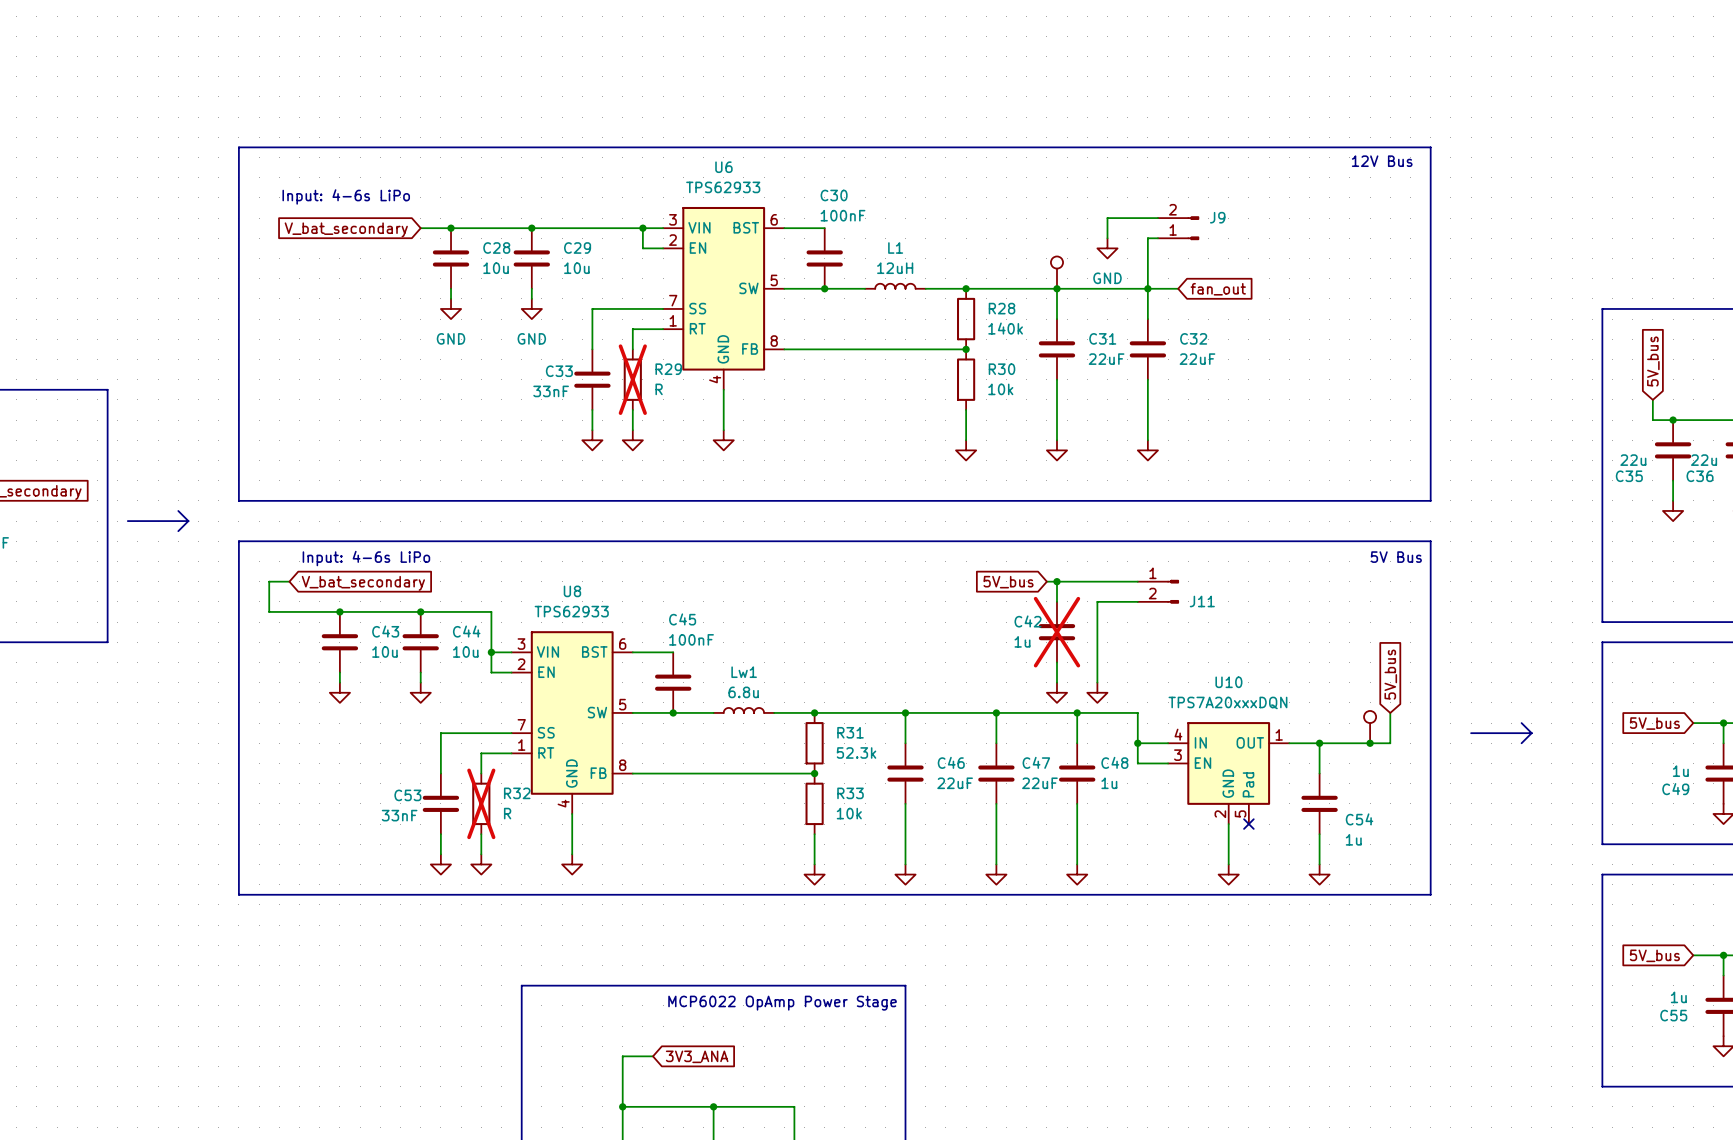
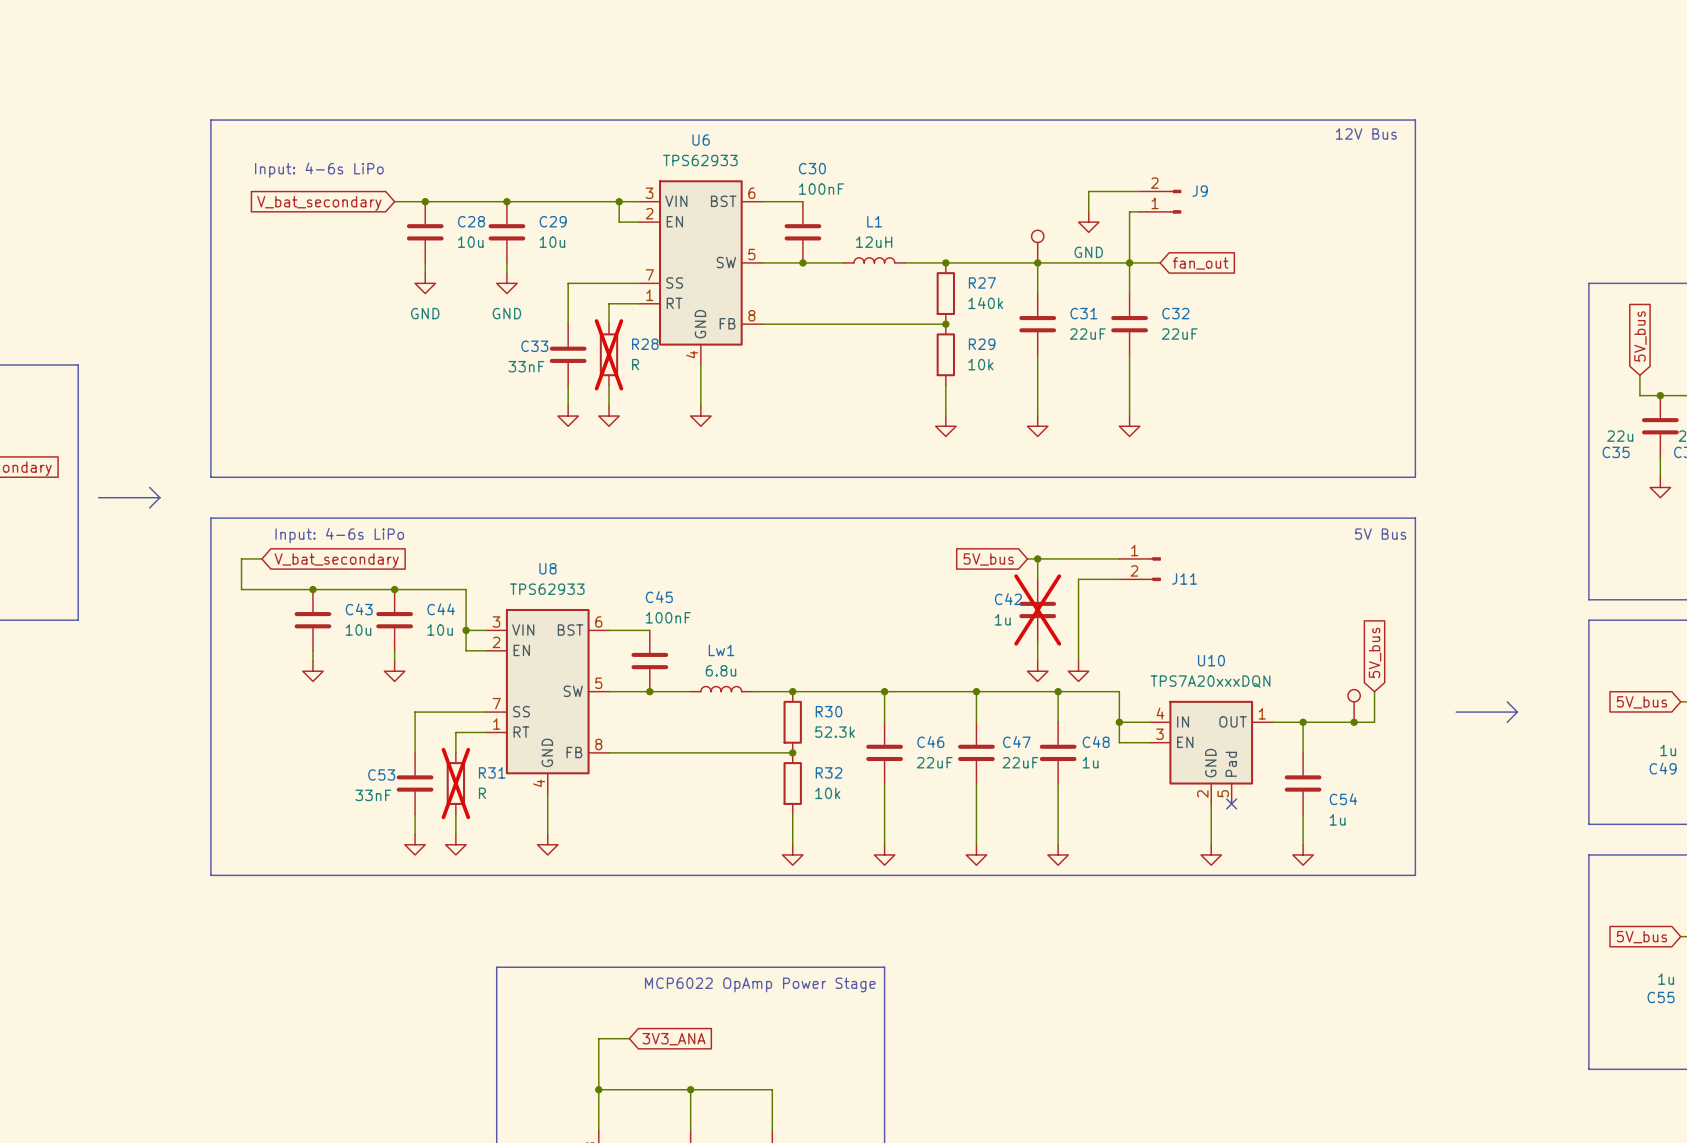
R28 name: R28 (1002, 308) -> R27 (982, 282)
R29 name: R29 (668, 369) -> R28 (645, 344)
R30 name: R30 (1002, 369) -> R29 (982, 344)
R31 name: R31 (850, 732) -> R30 (829, 711)
R32 name: R32 (517, 793) -> R31 (492, 772)
R33 name: R33 (850, 793) -> R32 (829, 772)

